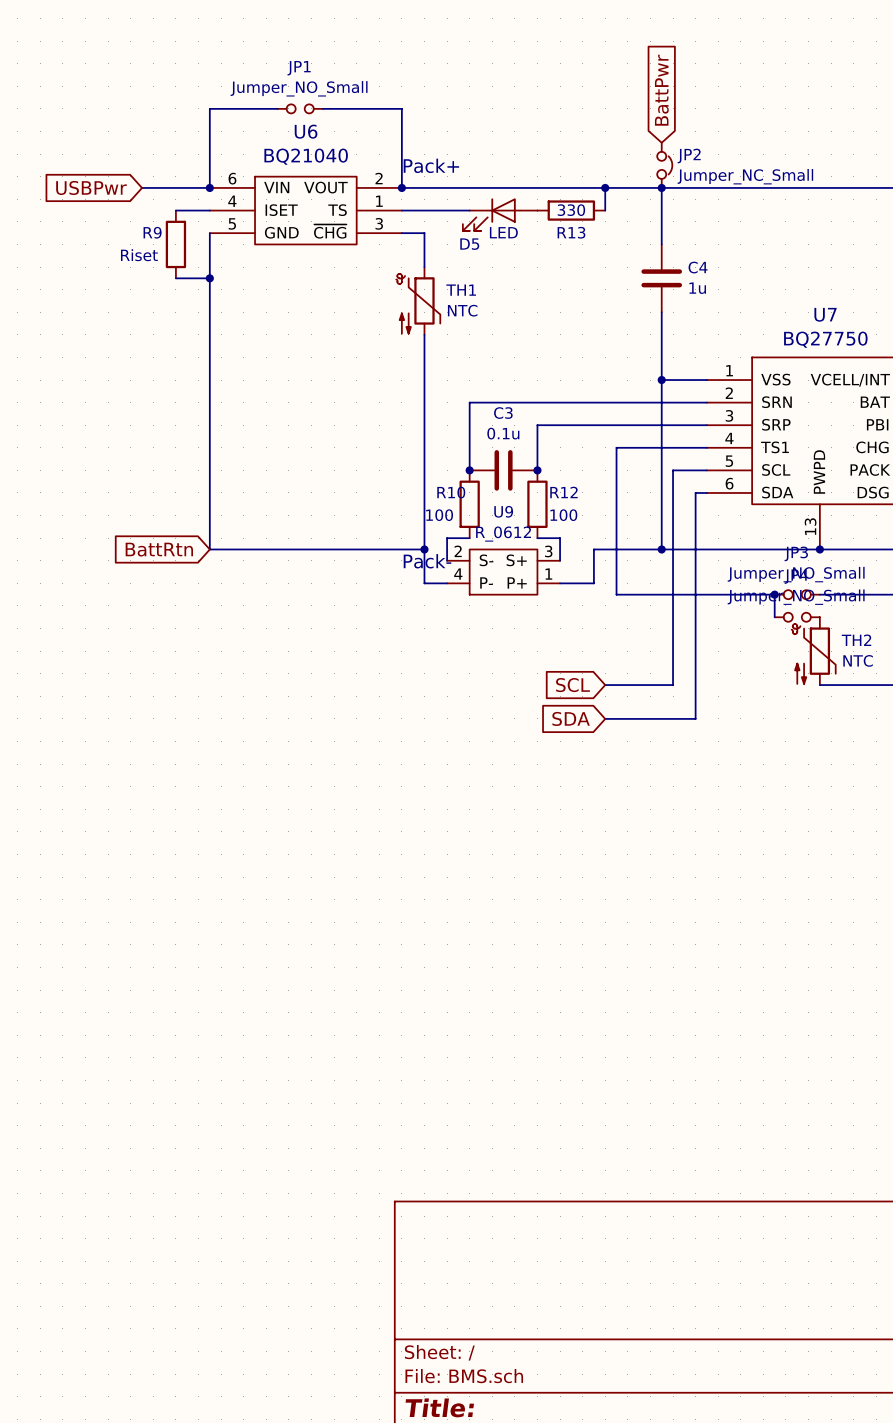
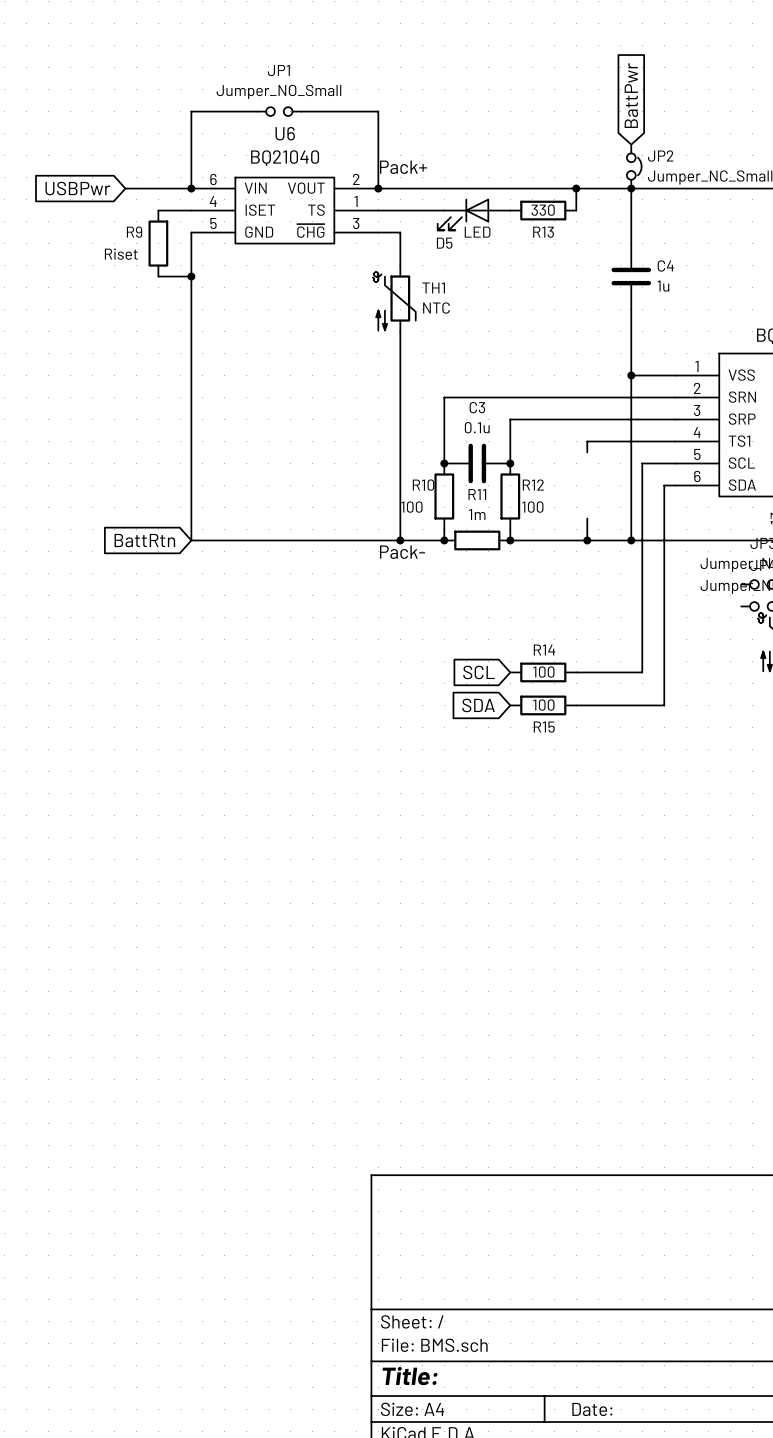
wire: (616, 459) (616, 526) -> none
wire: (469, 538) (447, 538) (447, 560) -> (444, 529) (444, 540) (400, 540)
wire: (537, 538) (560, 538) (560, 560) -> (510, 529) (510, 540) (565, 540)
wire: (424, 549) (424, 583) (447, 583) -> none
junction: none -> (444, 540)
R11: none -> 1m (477, 540)
junction: none -> (510, 540)
wire: (593, 549) (593, 583) (560, 583) -> none
wire: (616, 549) (616, 594) (774, 594) (774, 617) -> none
junction: none -> (587, 540)
U9: R_0612 (503, 572) -> none
junction: (774, 594) -> none
R14: none -> 100 (543, 672)
global label position: SCL (572, 685) -> SCL (479, 672)
global label position: SDA (571, 718) -> SDA (478, 705)
R15: none -> 100 (543, 705)

